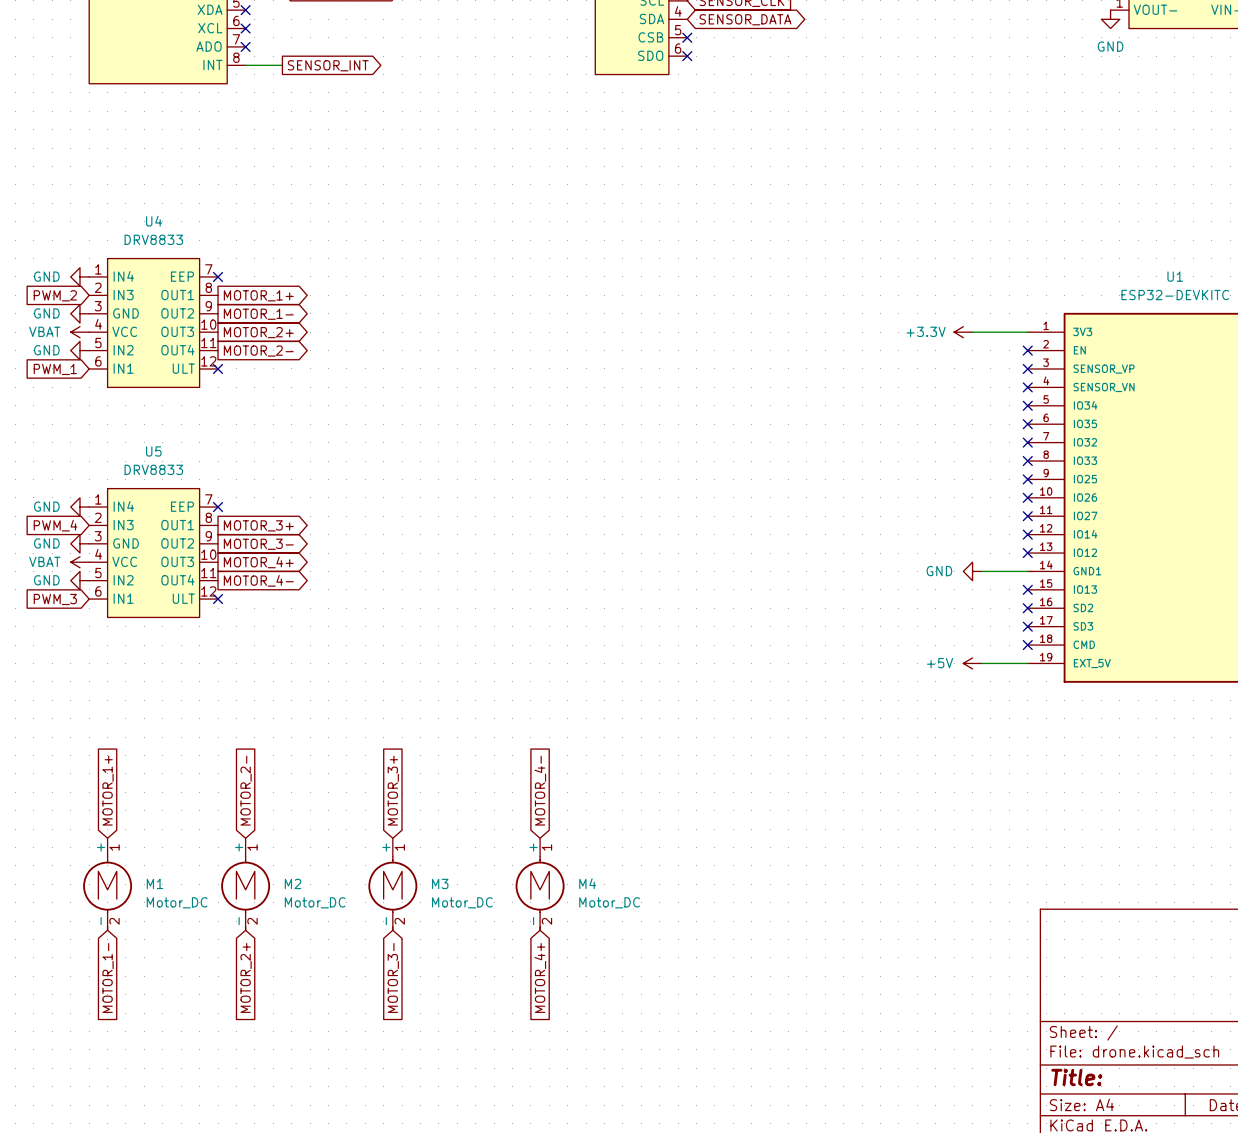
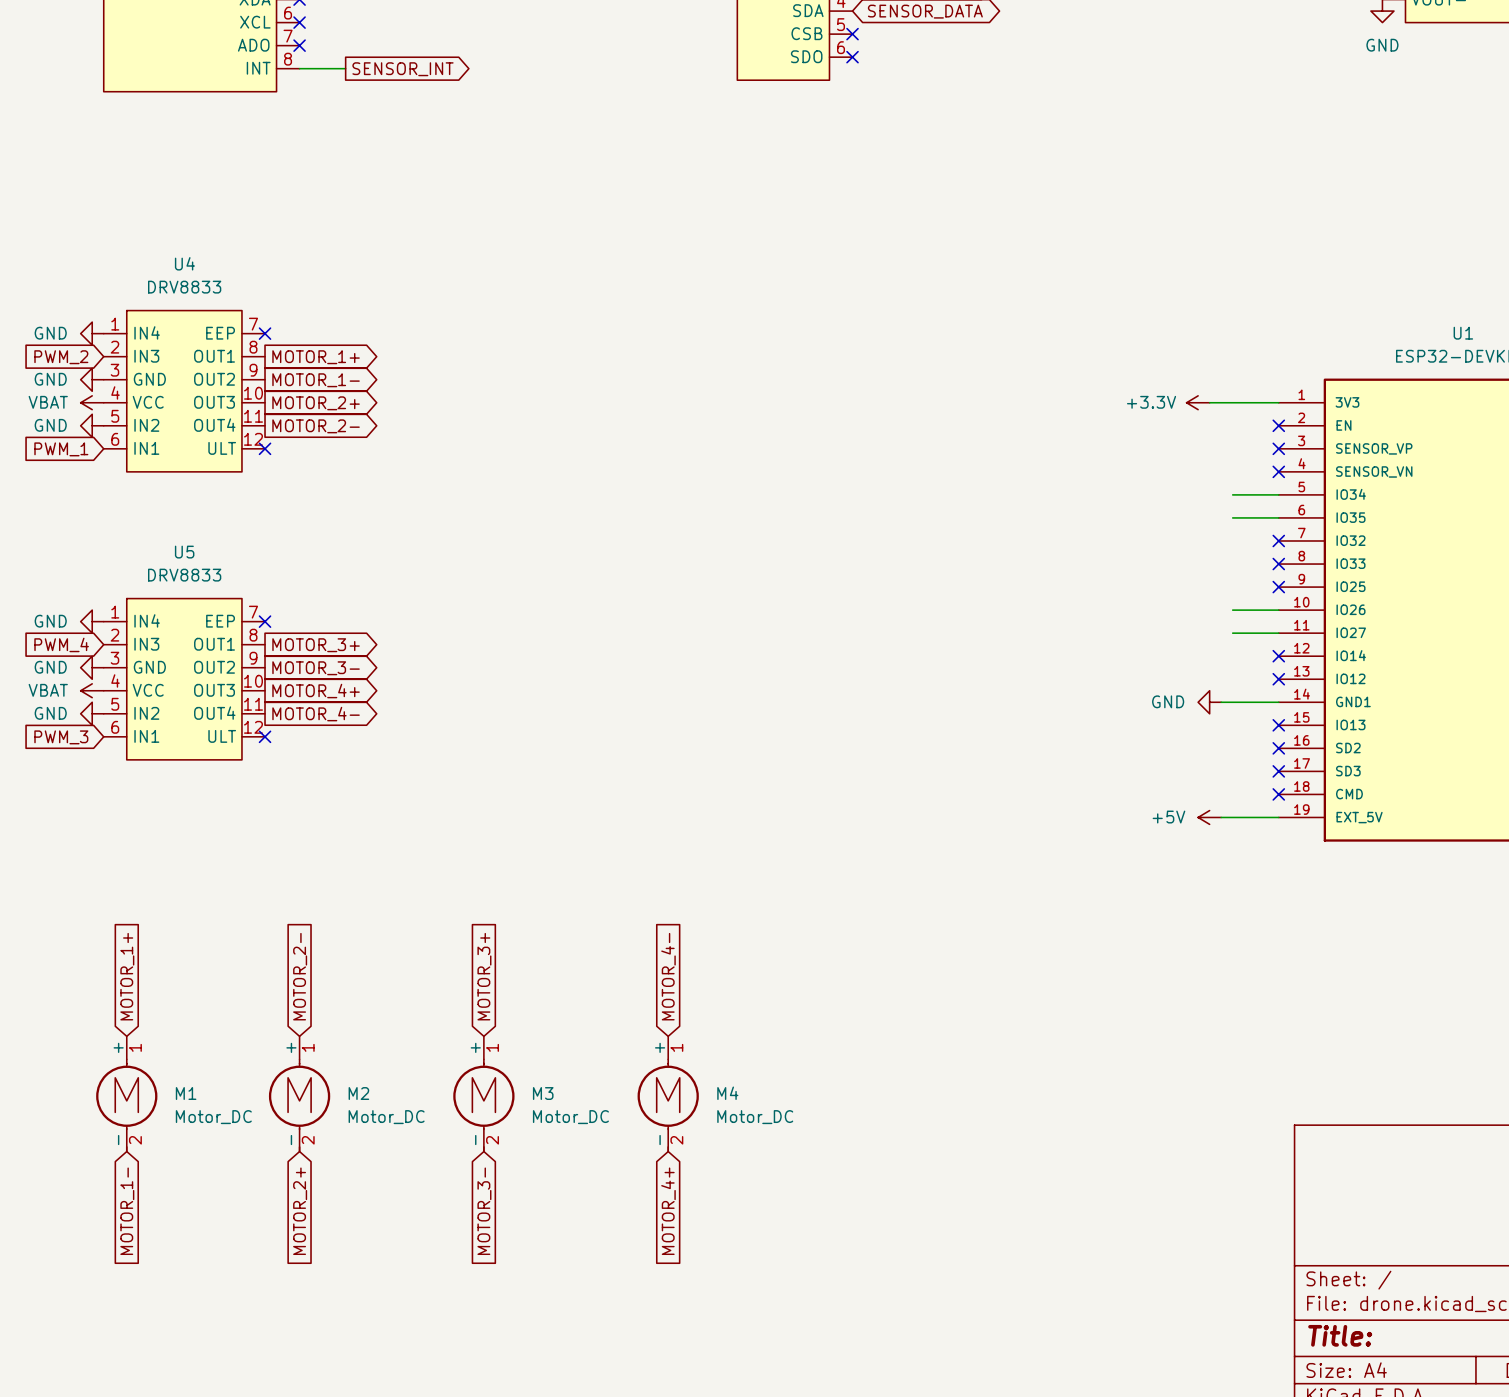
wire: none -> (1232, 494) (1278, 494)
no-connect mark: (1027, 405) -> none
wire: none -> (1232, 517) (1278, 517)
no-connect mark: (1027, 424) -> none
wire: none -> (1232, 610) (1278, 610)
no-connect mark: (1027, 497) -> none
wire: none -> (1232, 633) (1278, 633)
no-connect mark: (1027, 516) -> none

